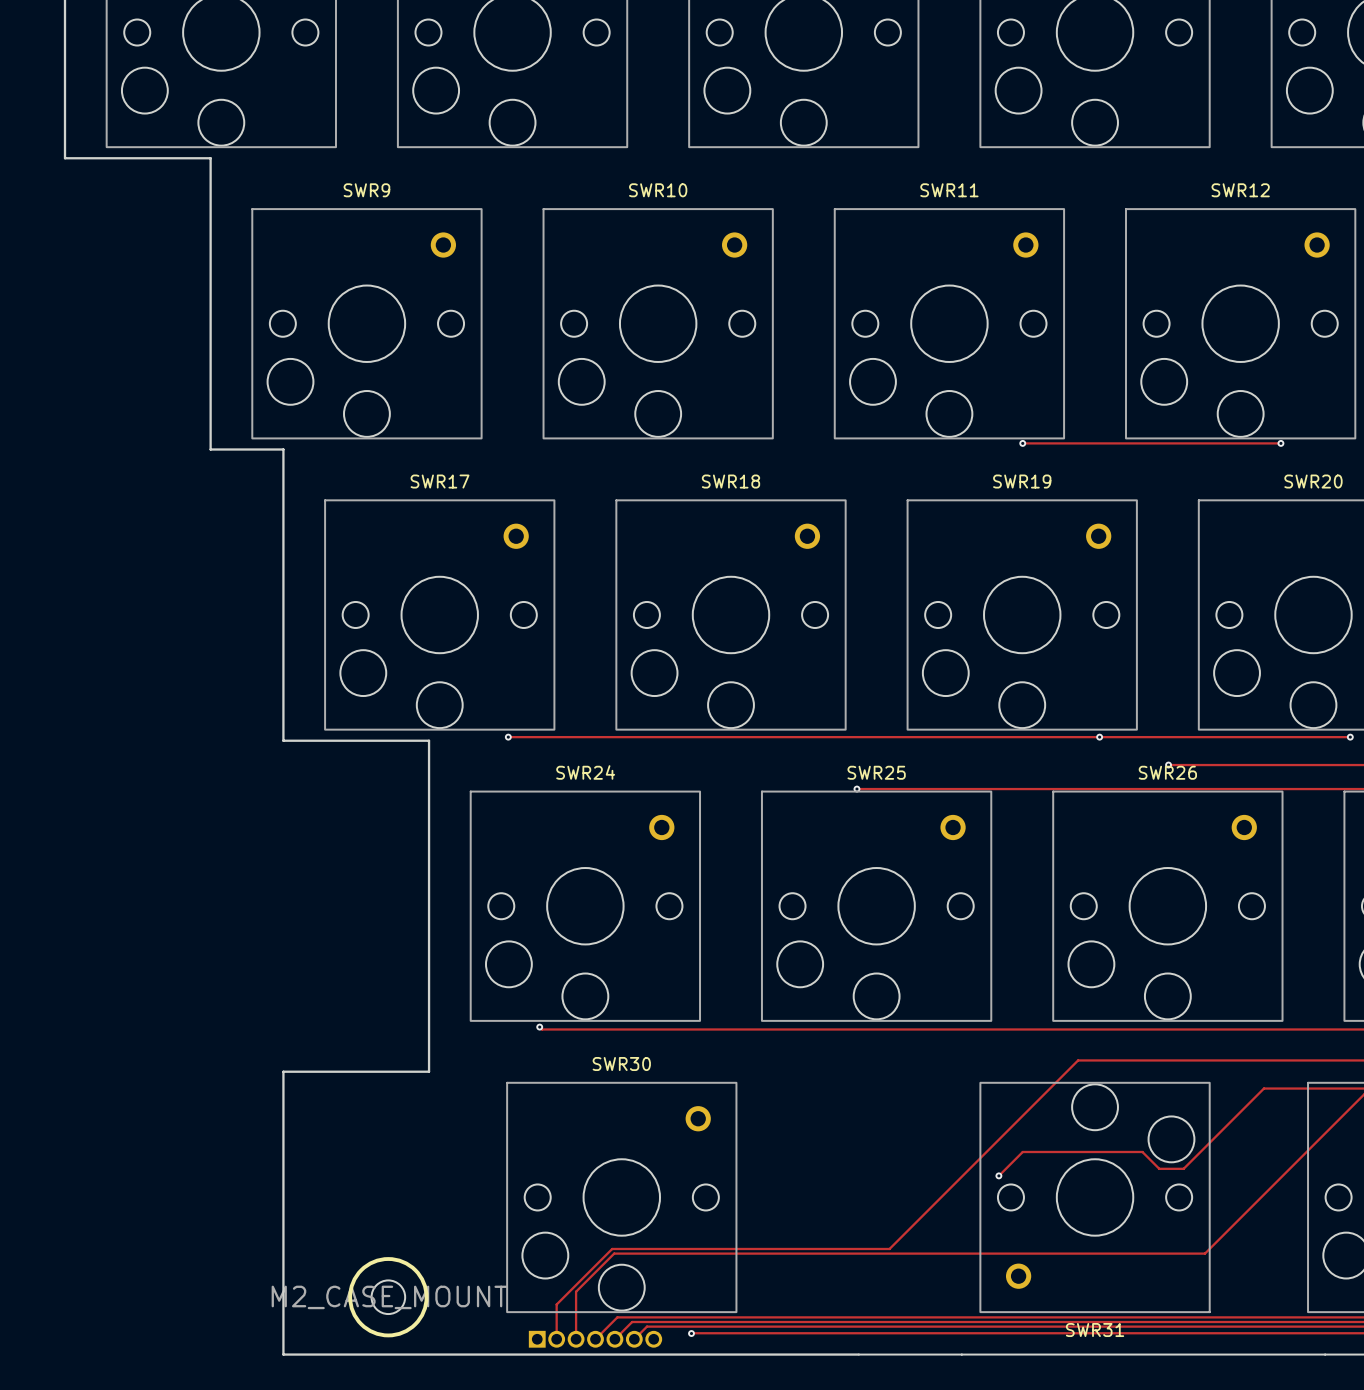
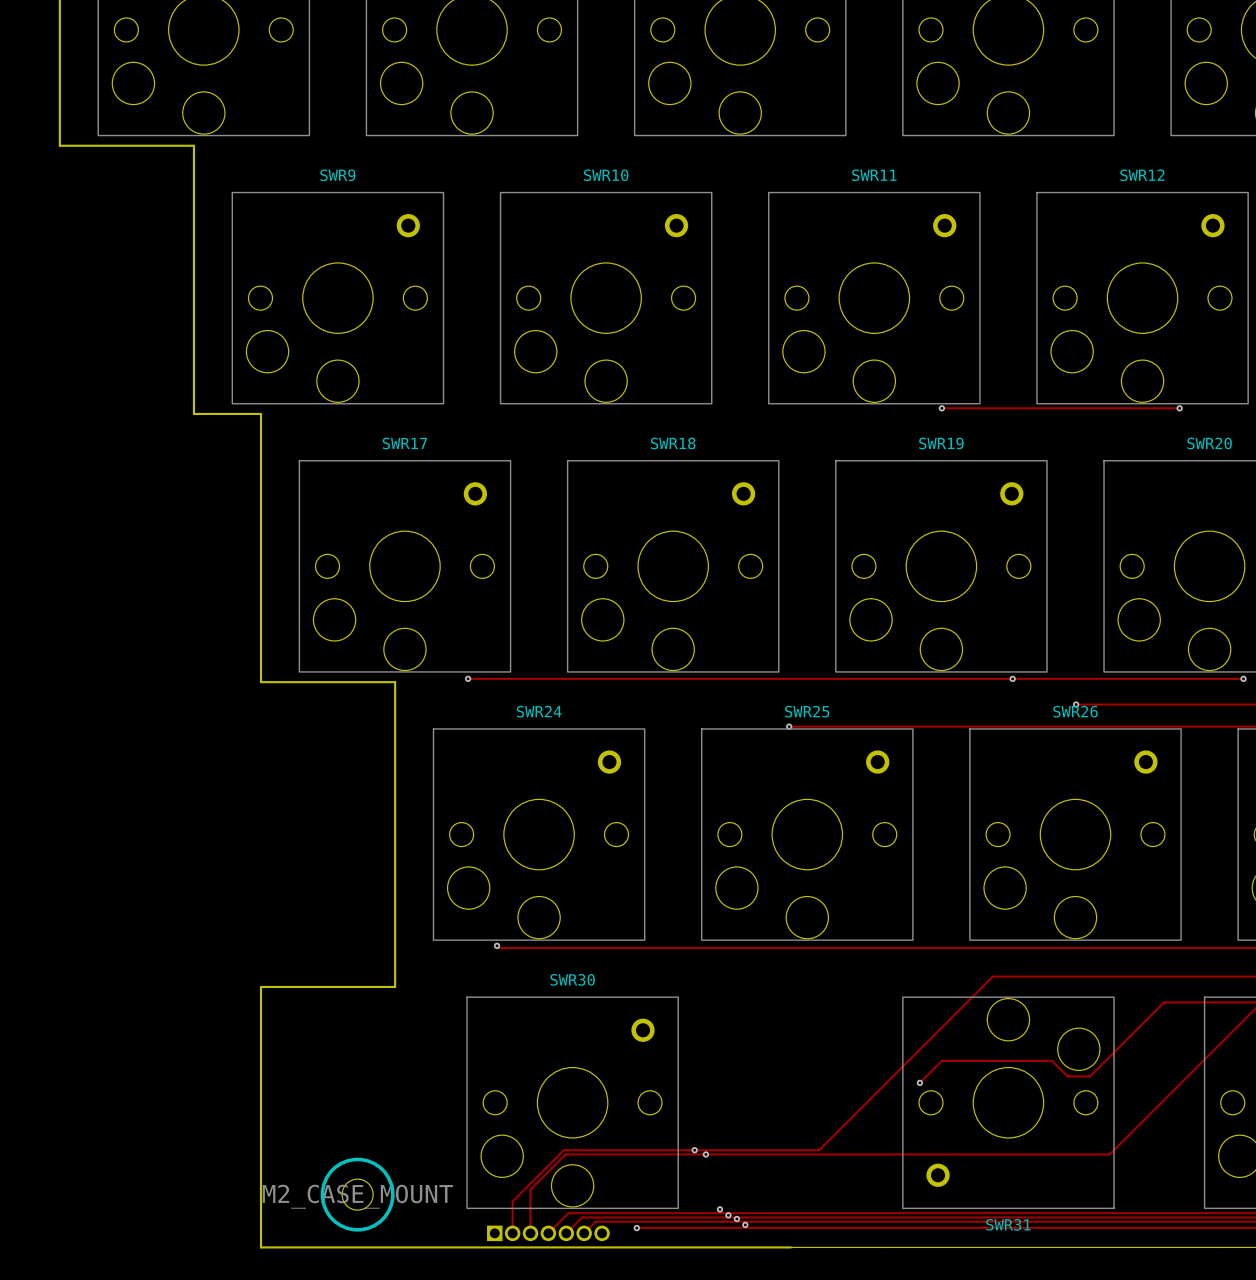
via: none -> (694, 1150)
via: none -> (705, 1154)
via: none -> (719, 1209)
via: none -> (728, 1215)
via: none -> (736, 1219)
via: none -> (745, 1224)

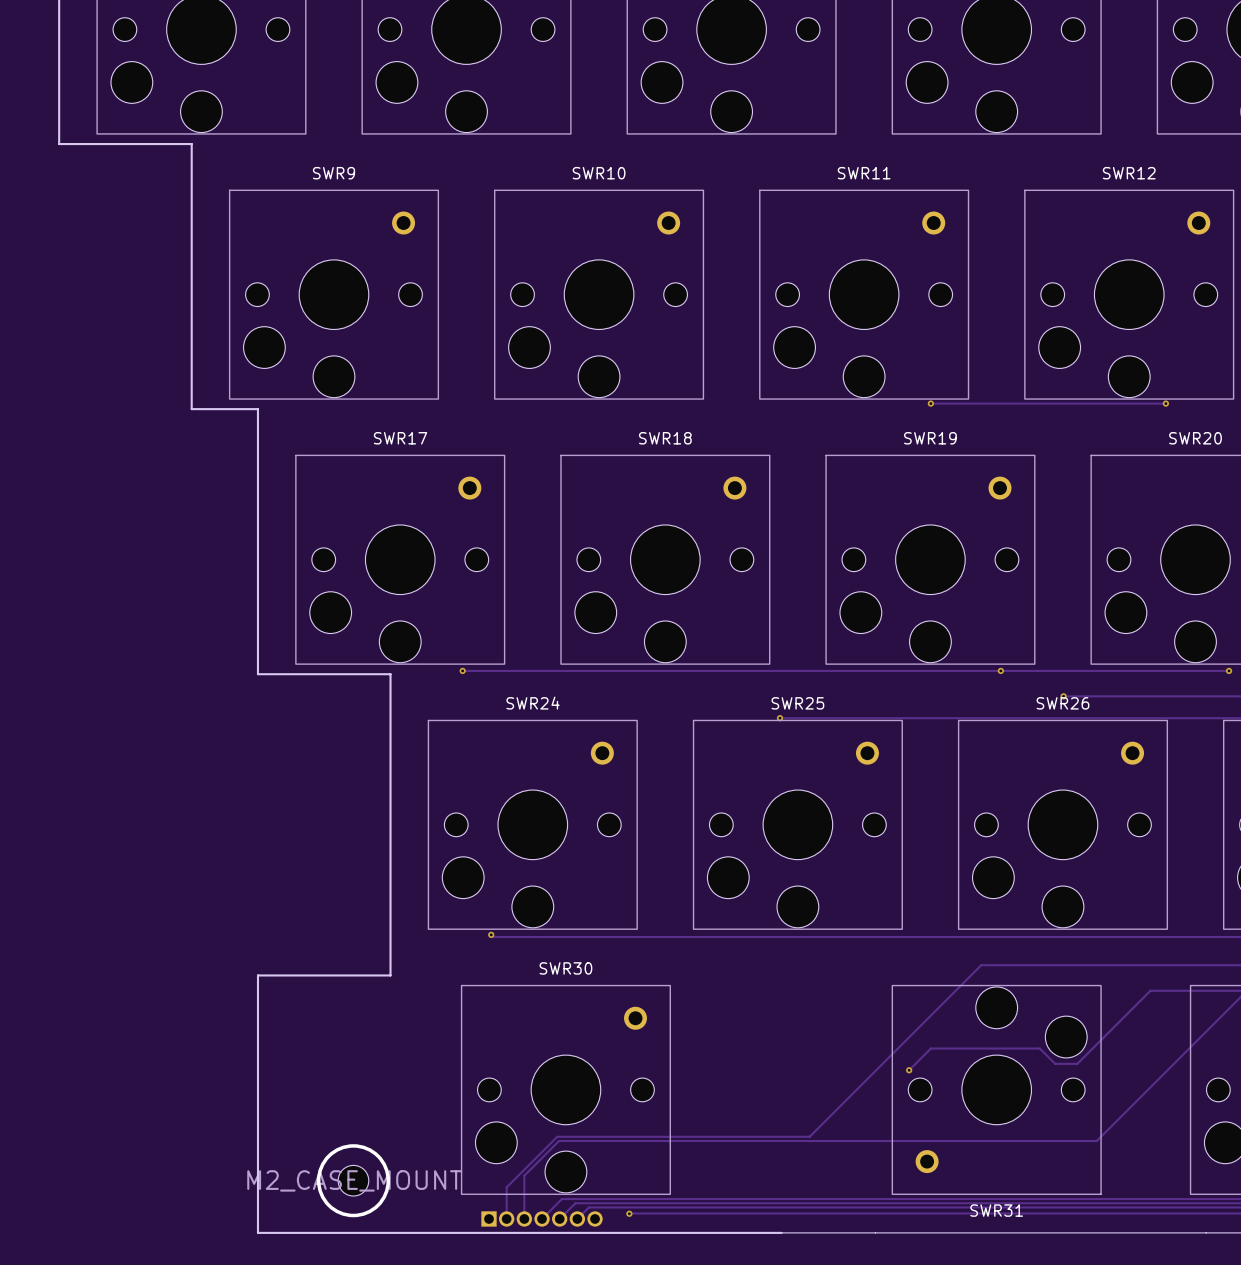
via: (694, 1150) -> none
via: (705, 1154) -> none
via: (719, 1209) -> none
via: (728, 1215) -> none
via: (736, 1219) -> none
via: (745, 1224) -> none

